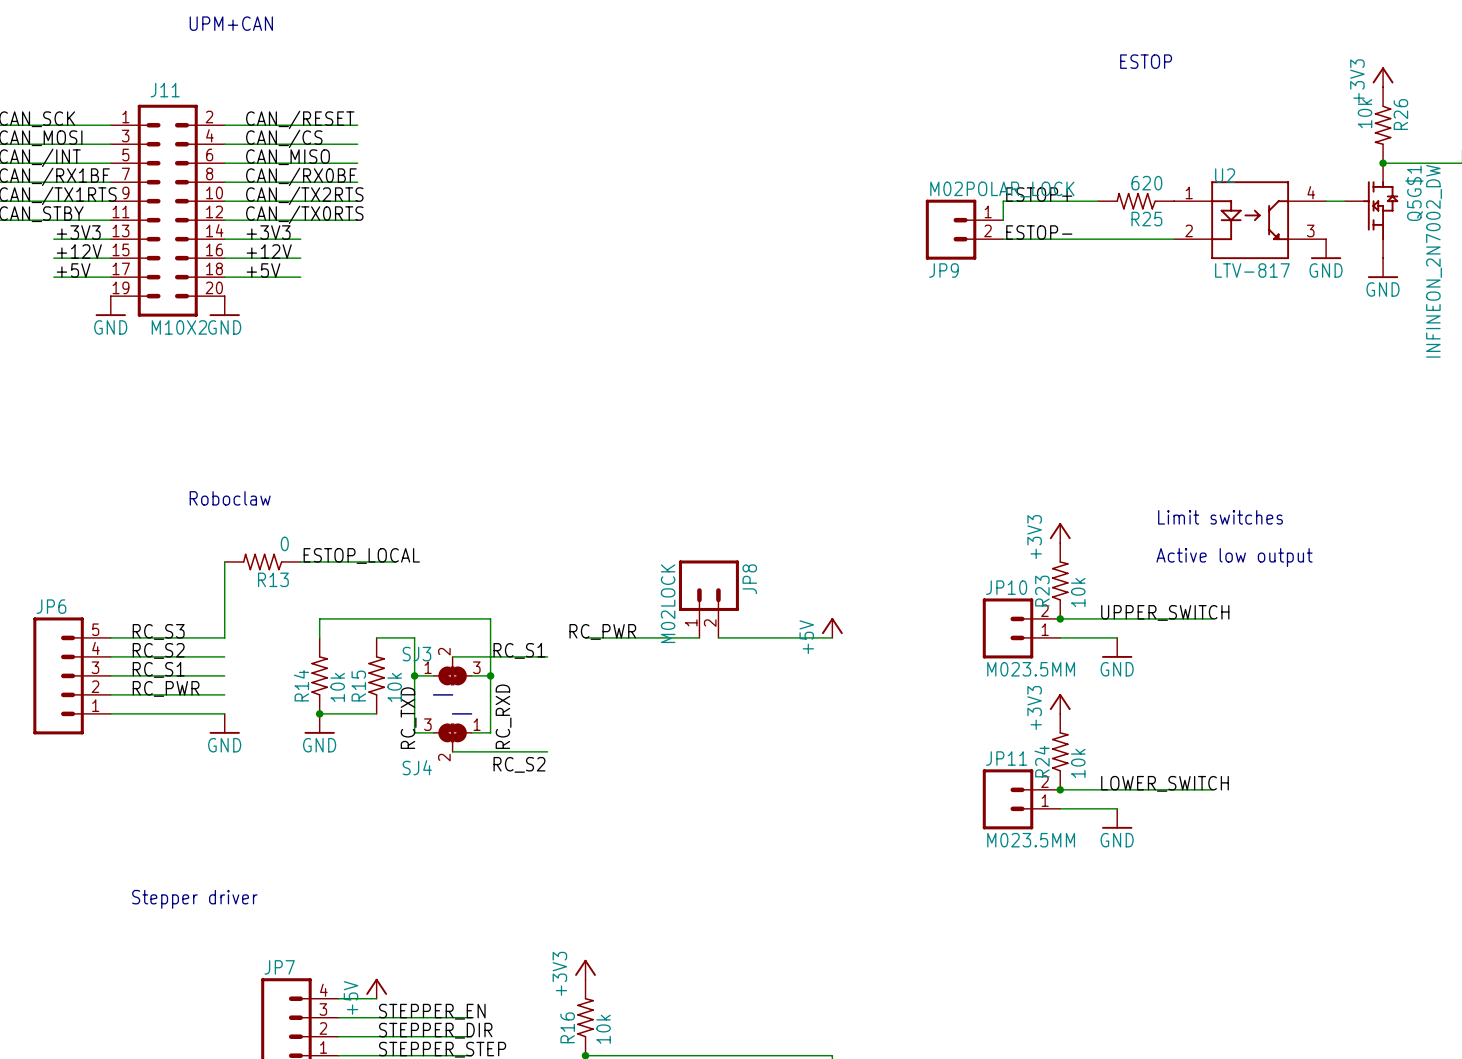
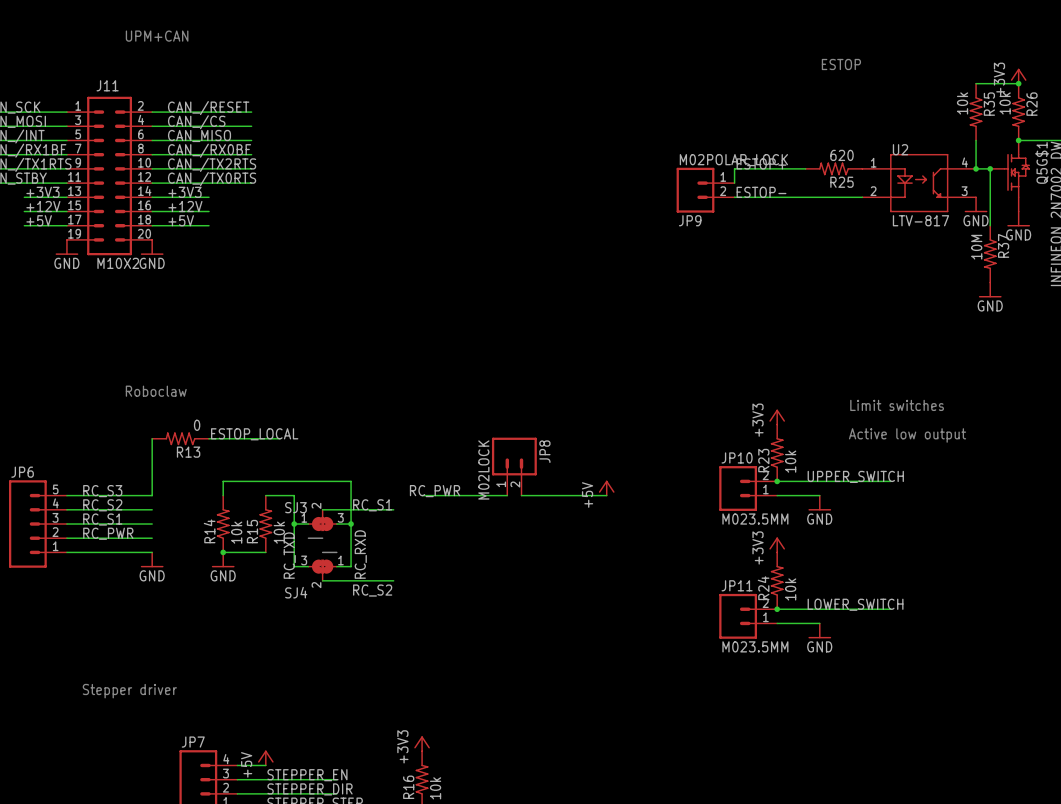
wire: none -> (976, 83) (1018, 83)
junction: none -> (1018, 83)
R35: none -> 10k (976, 112)
wire: none -> (976, 140) (976, 168)
junction: none -> (976, 168)
wire: none -> (990, 168) (990, 225)
junction: none -> (990, 168)
R37: none -> 10M (990, 254)
power symbol: none -> GND (990, 289)

